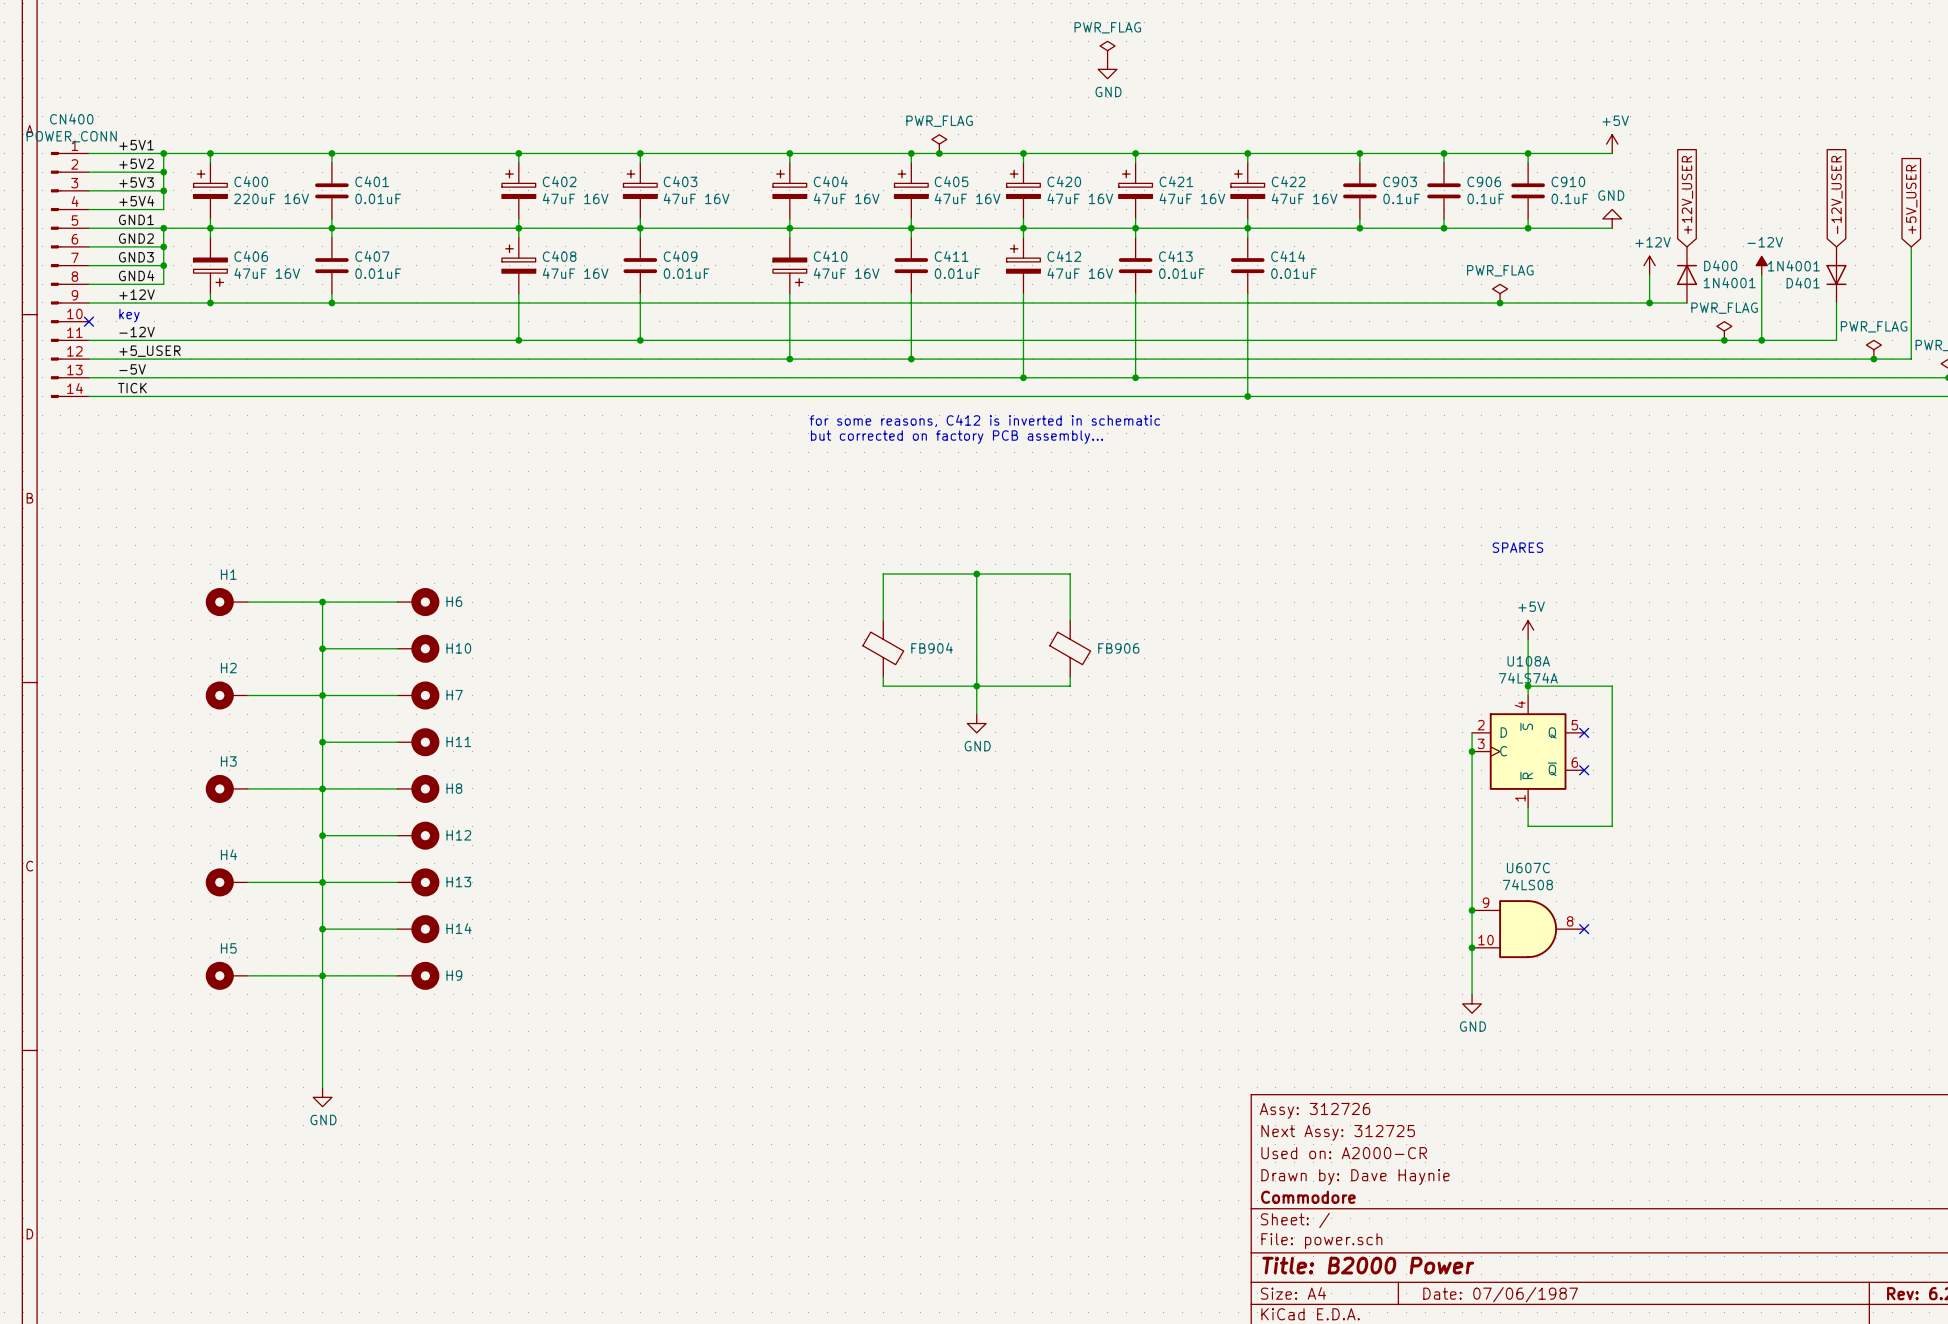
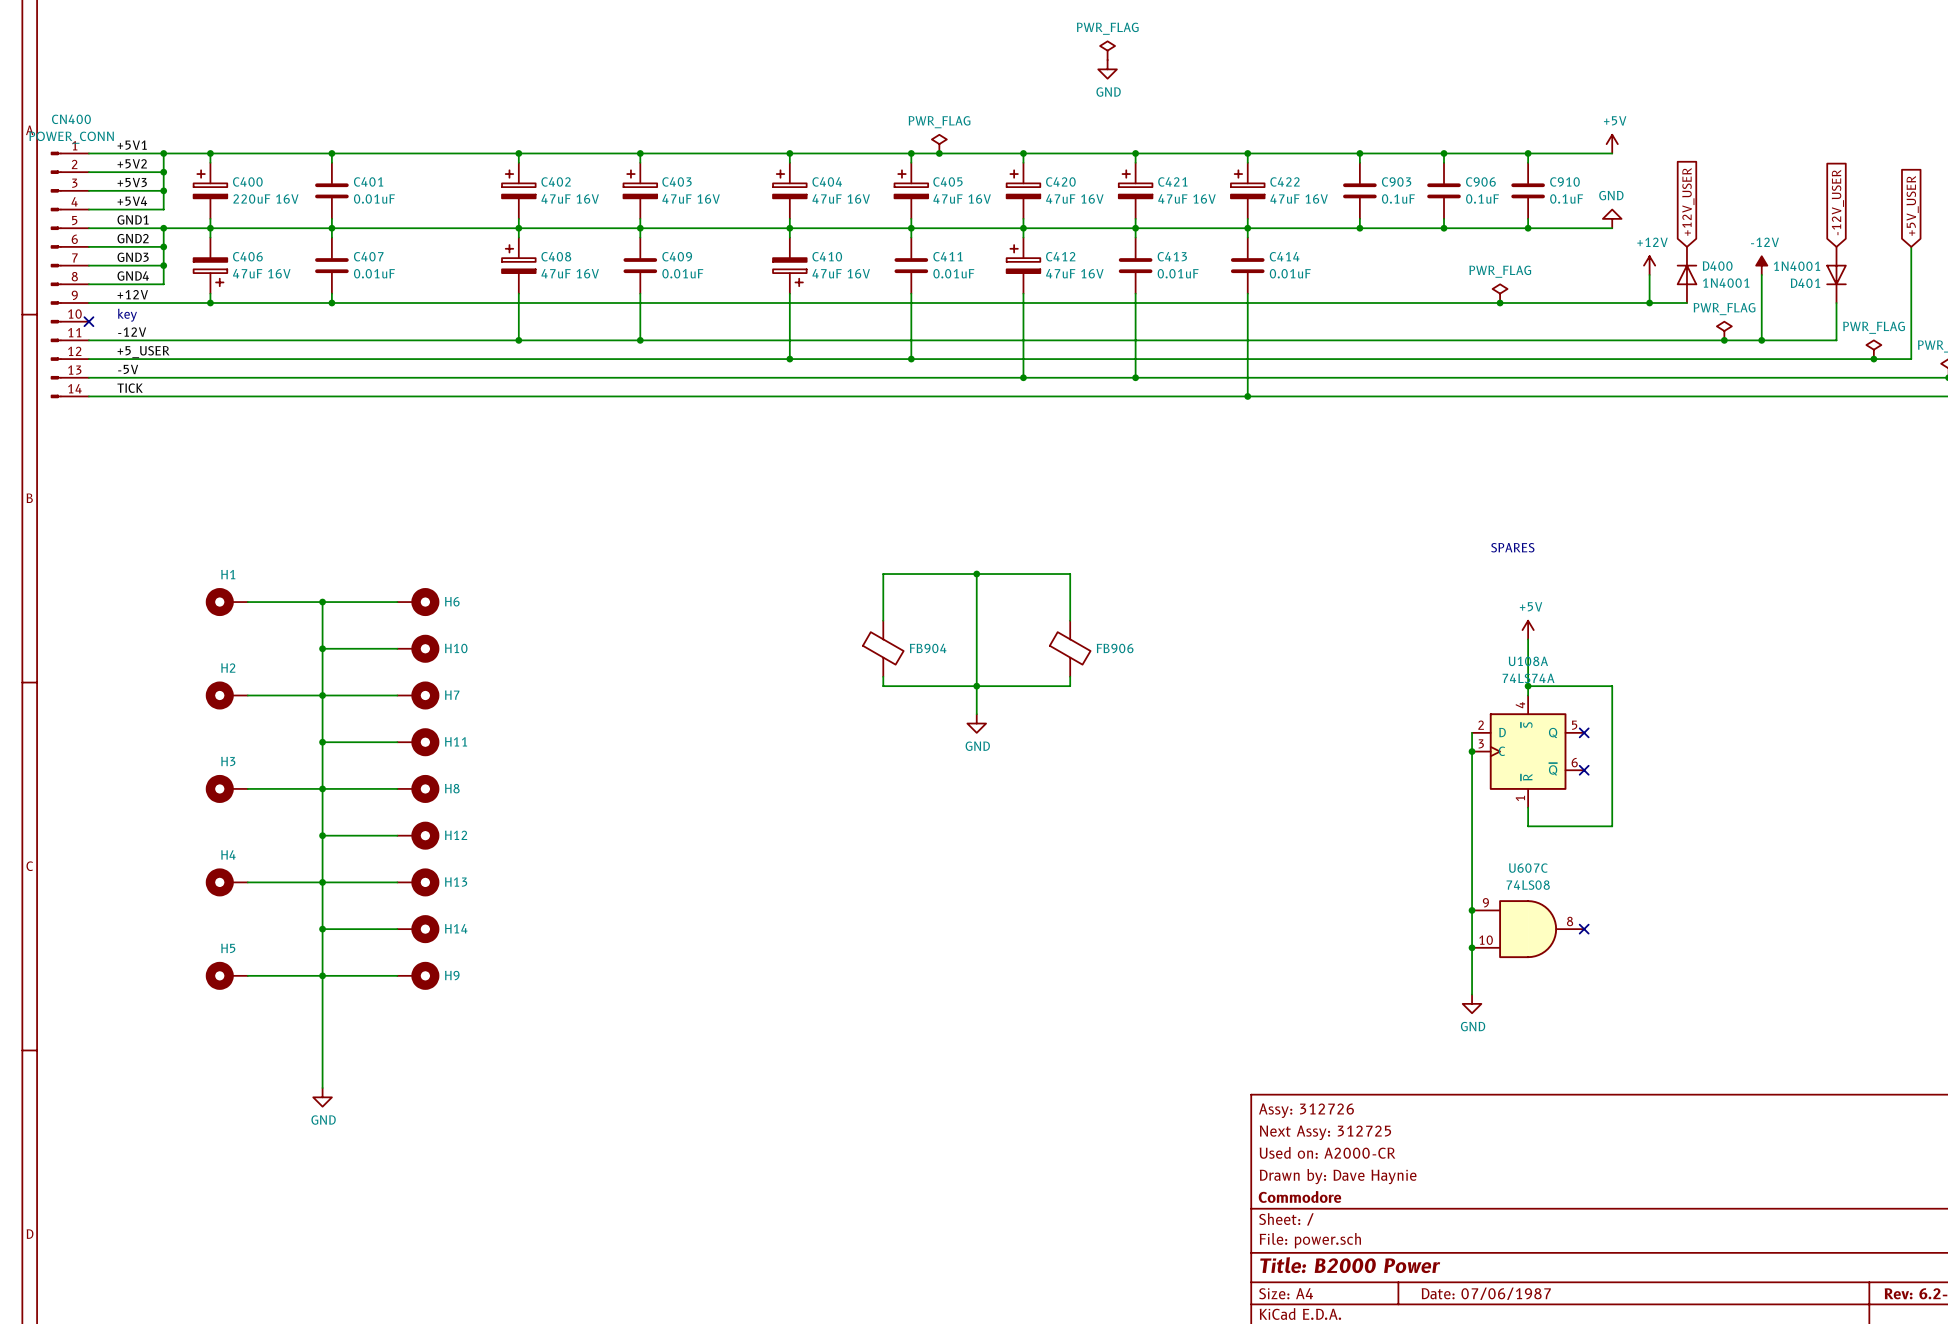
text: for some reasons, C412 is inverted in schematic (984, 420) -> none
text: but corrected on factory PCB assembly… (957, 437) -> none

